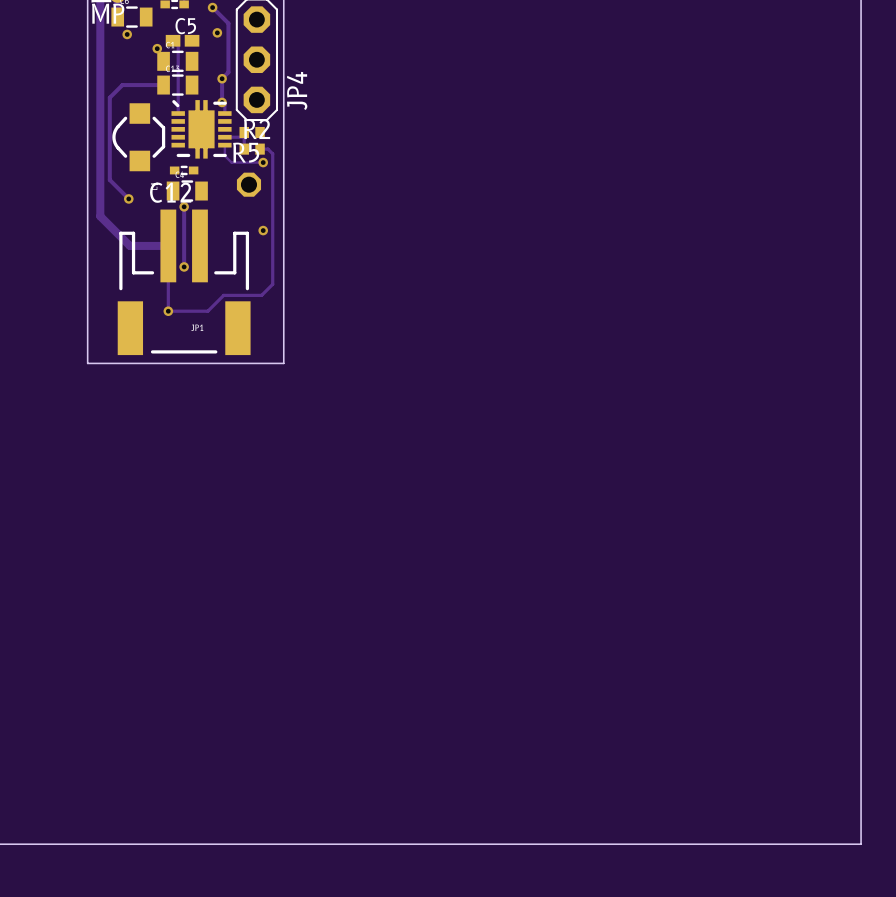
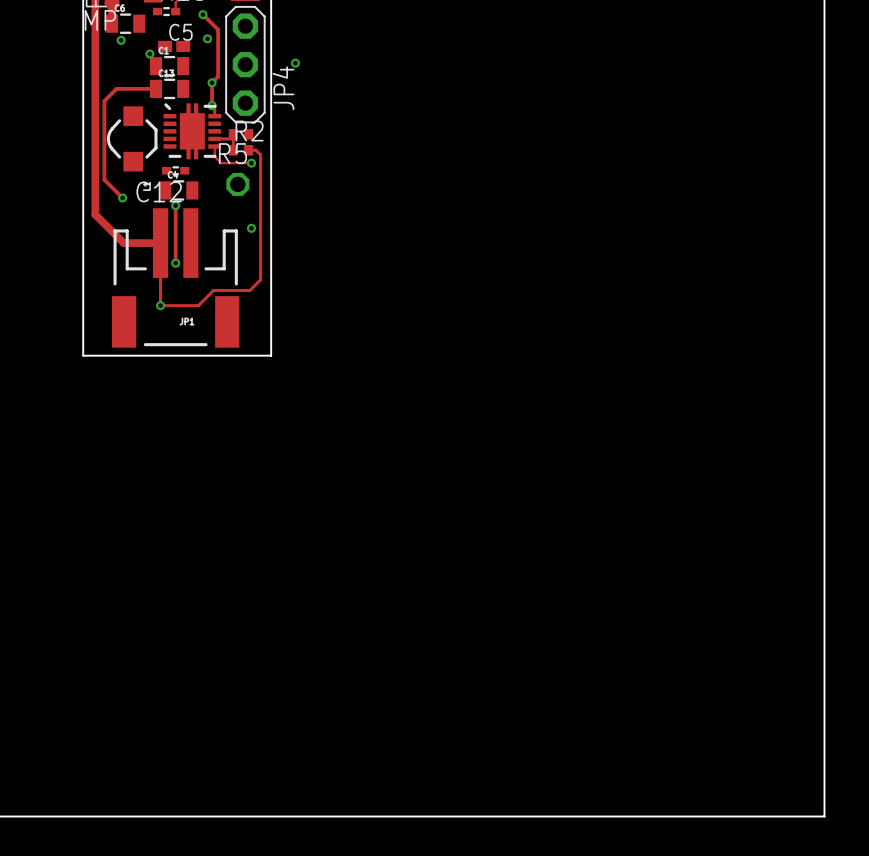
track: (173, 40) (178, 45) (178, 113) -> none
via: none -> (295, 63)

